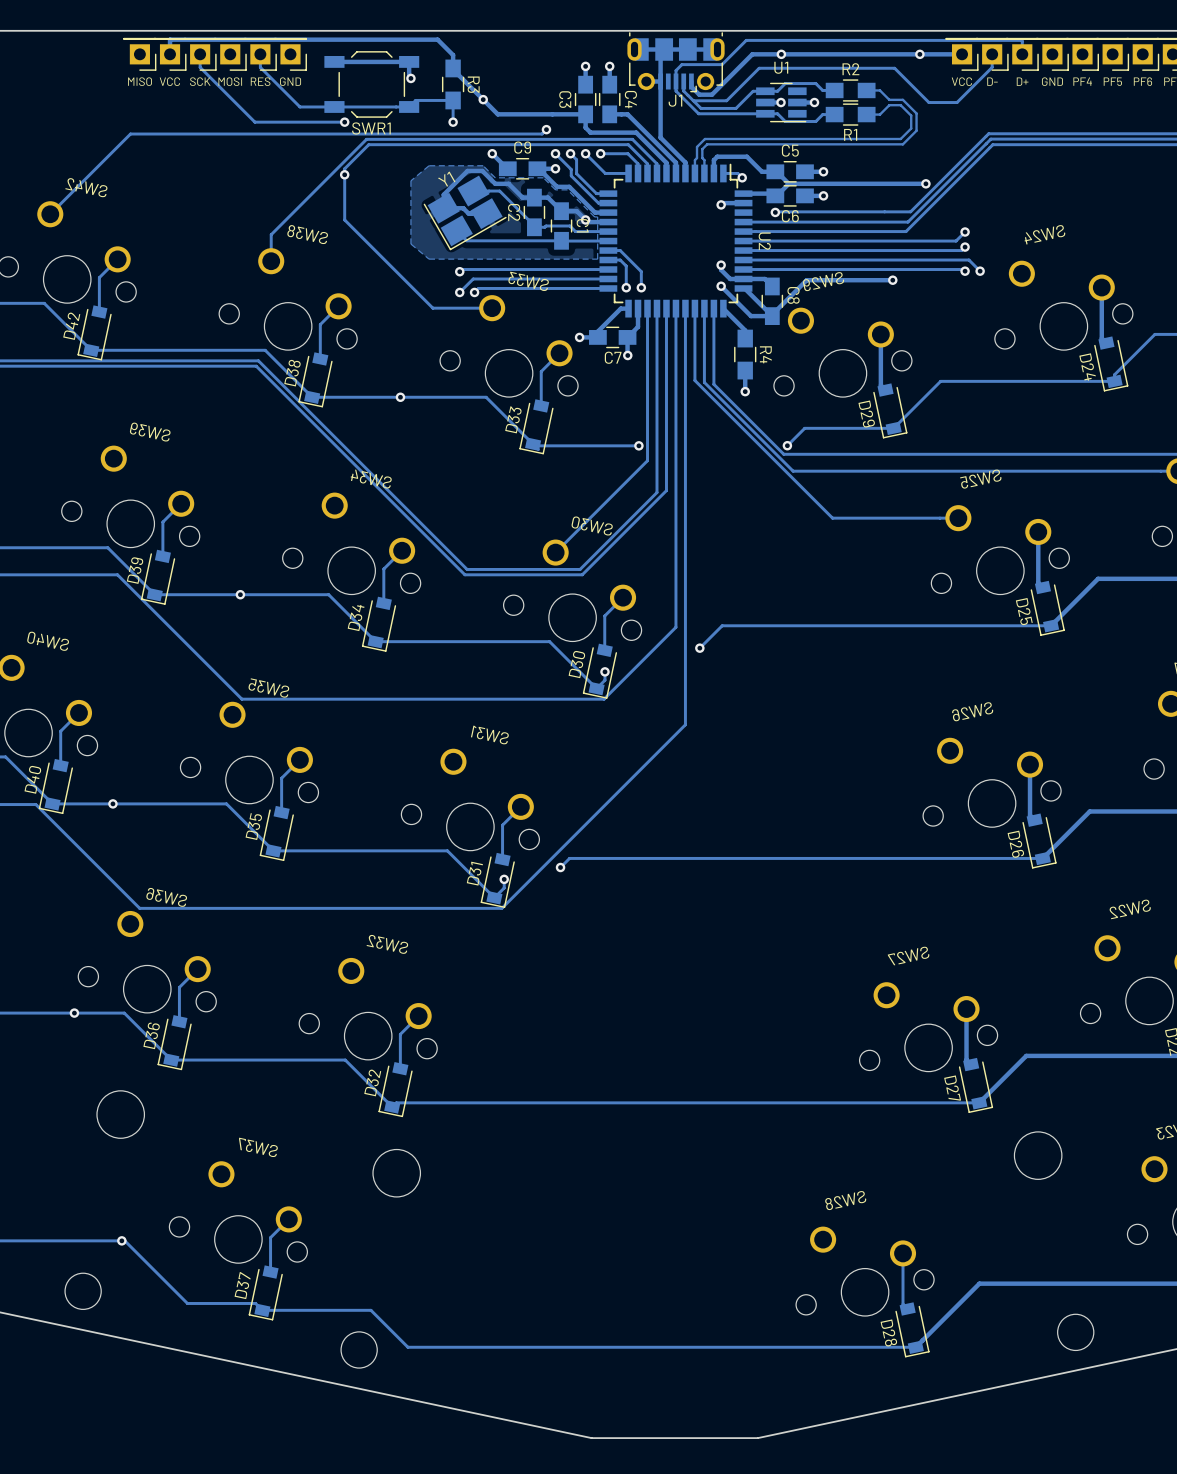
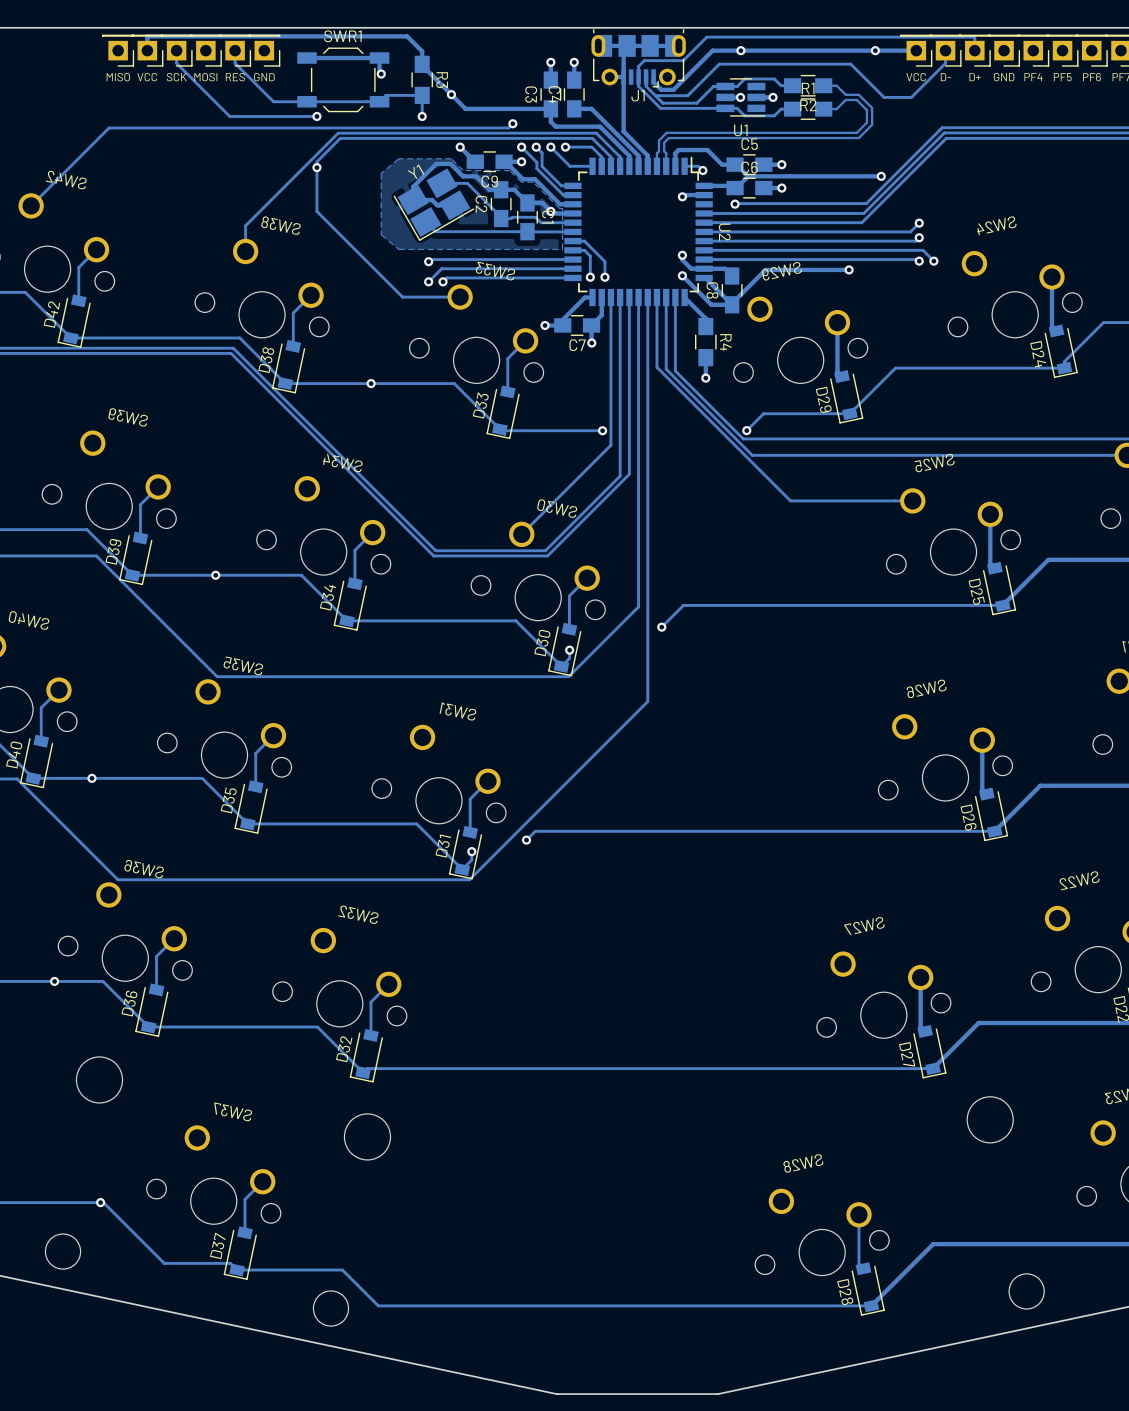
U1 name position: U1 (781, 67) -> U1 (740, 130)
R2 name position: R2 (850, 69) -> R2 (808, 105)
C4 name position: C4 (630, 99) -> C4 (554, 94)
SWR1 name position: SWR1 (371, 128) -> SWR1 (342, 36)
R1 name position: R1 (850, 134) -> R1 (808, 88)
C9 name position: C9 (522, 147) -> C9 (489, 181)
C6 name position: C6 (790, 216) -> C6 (749, 167)
C8 name position: C8 (793, 295) -> C8 (712, 290)

